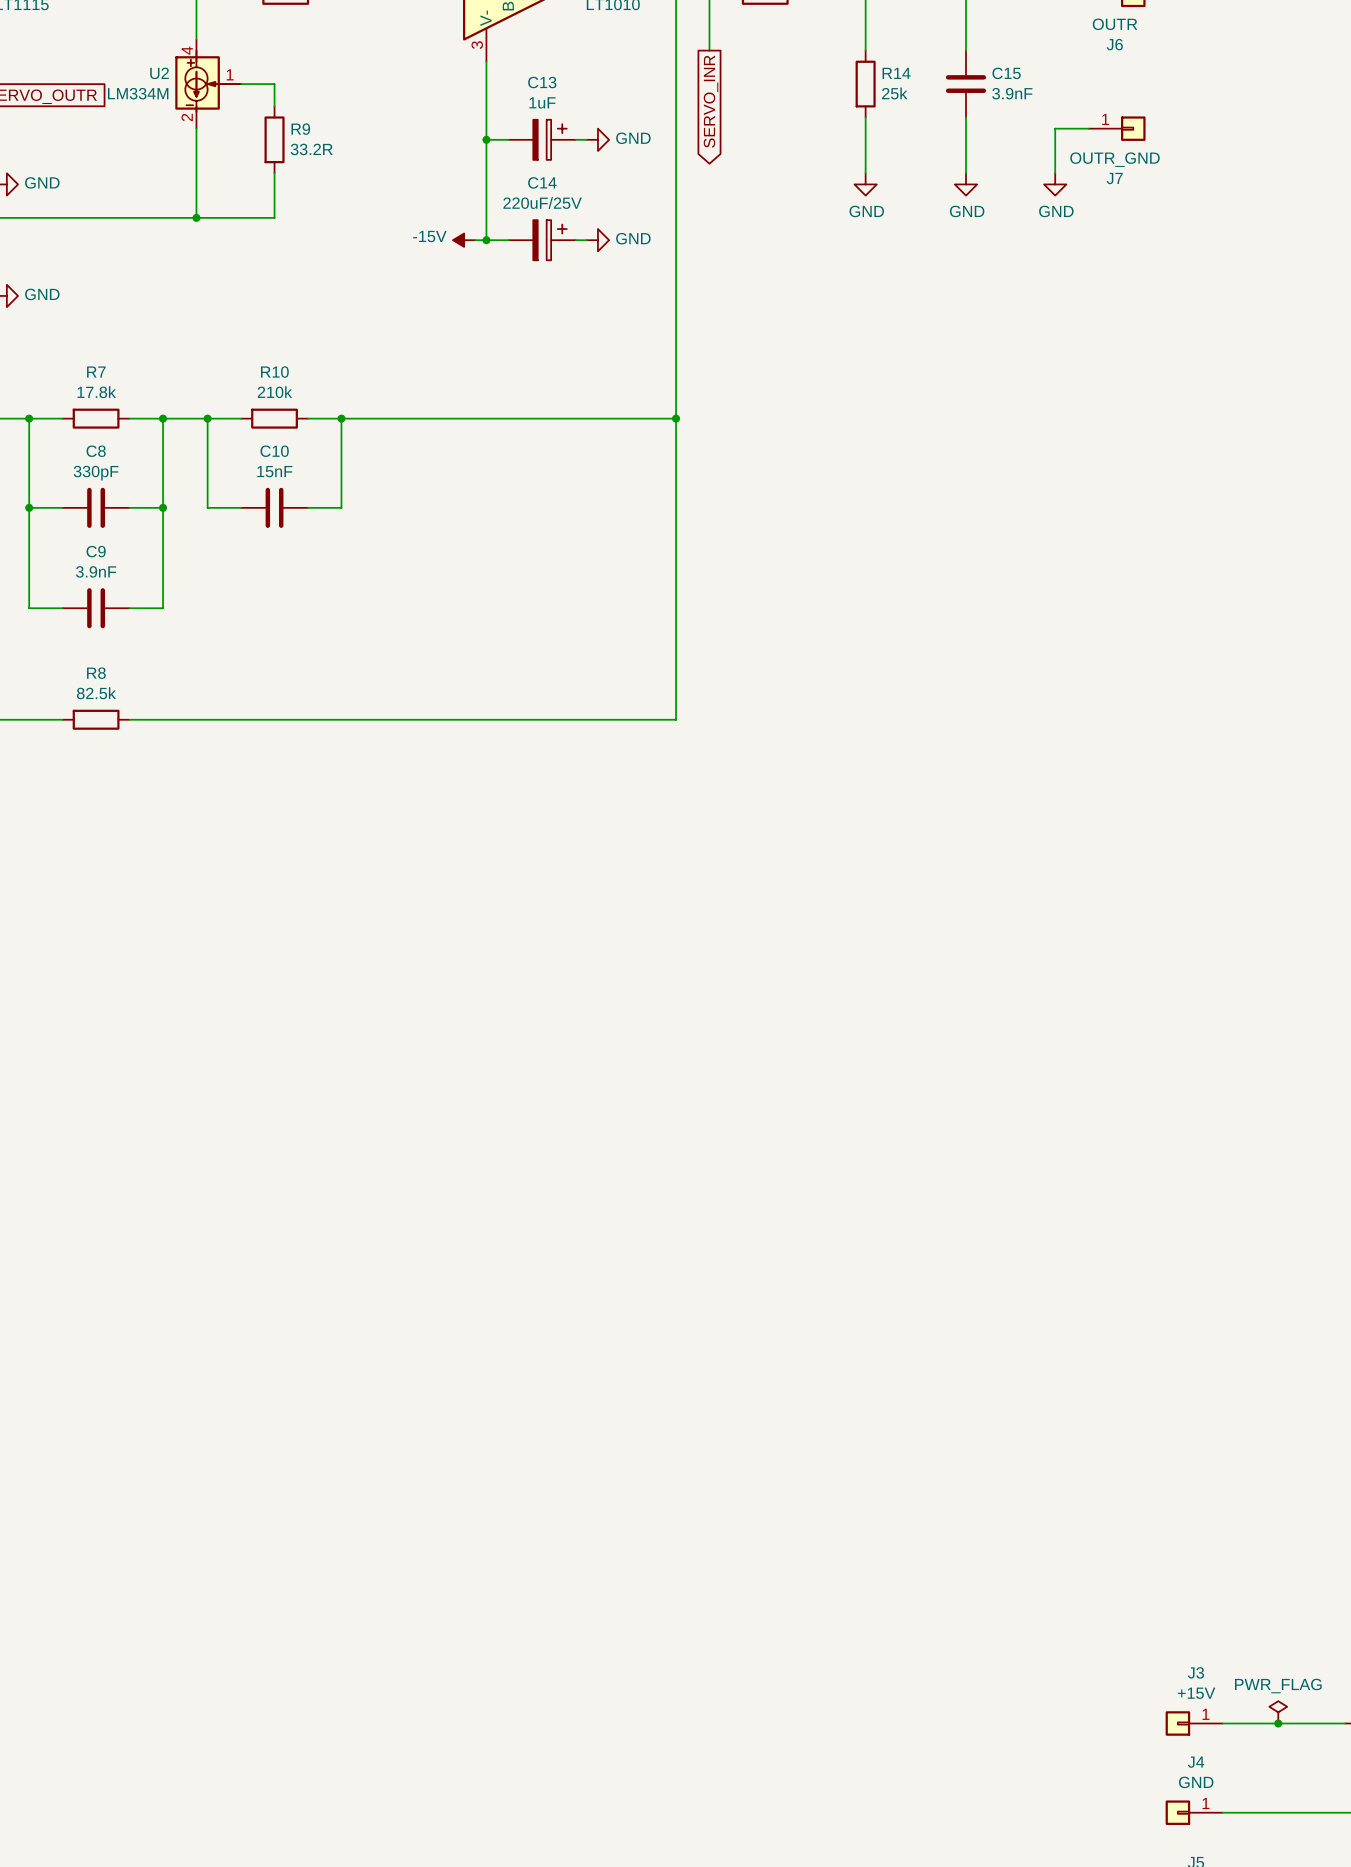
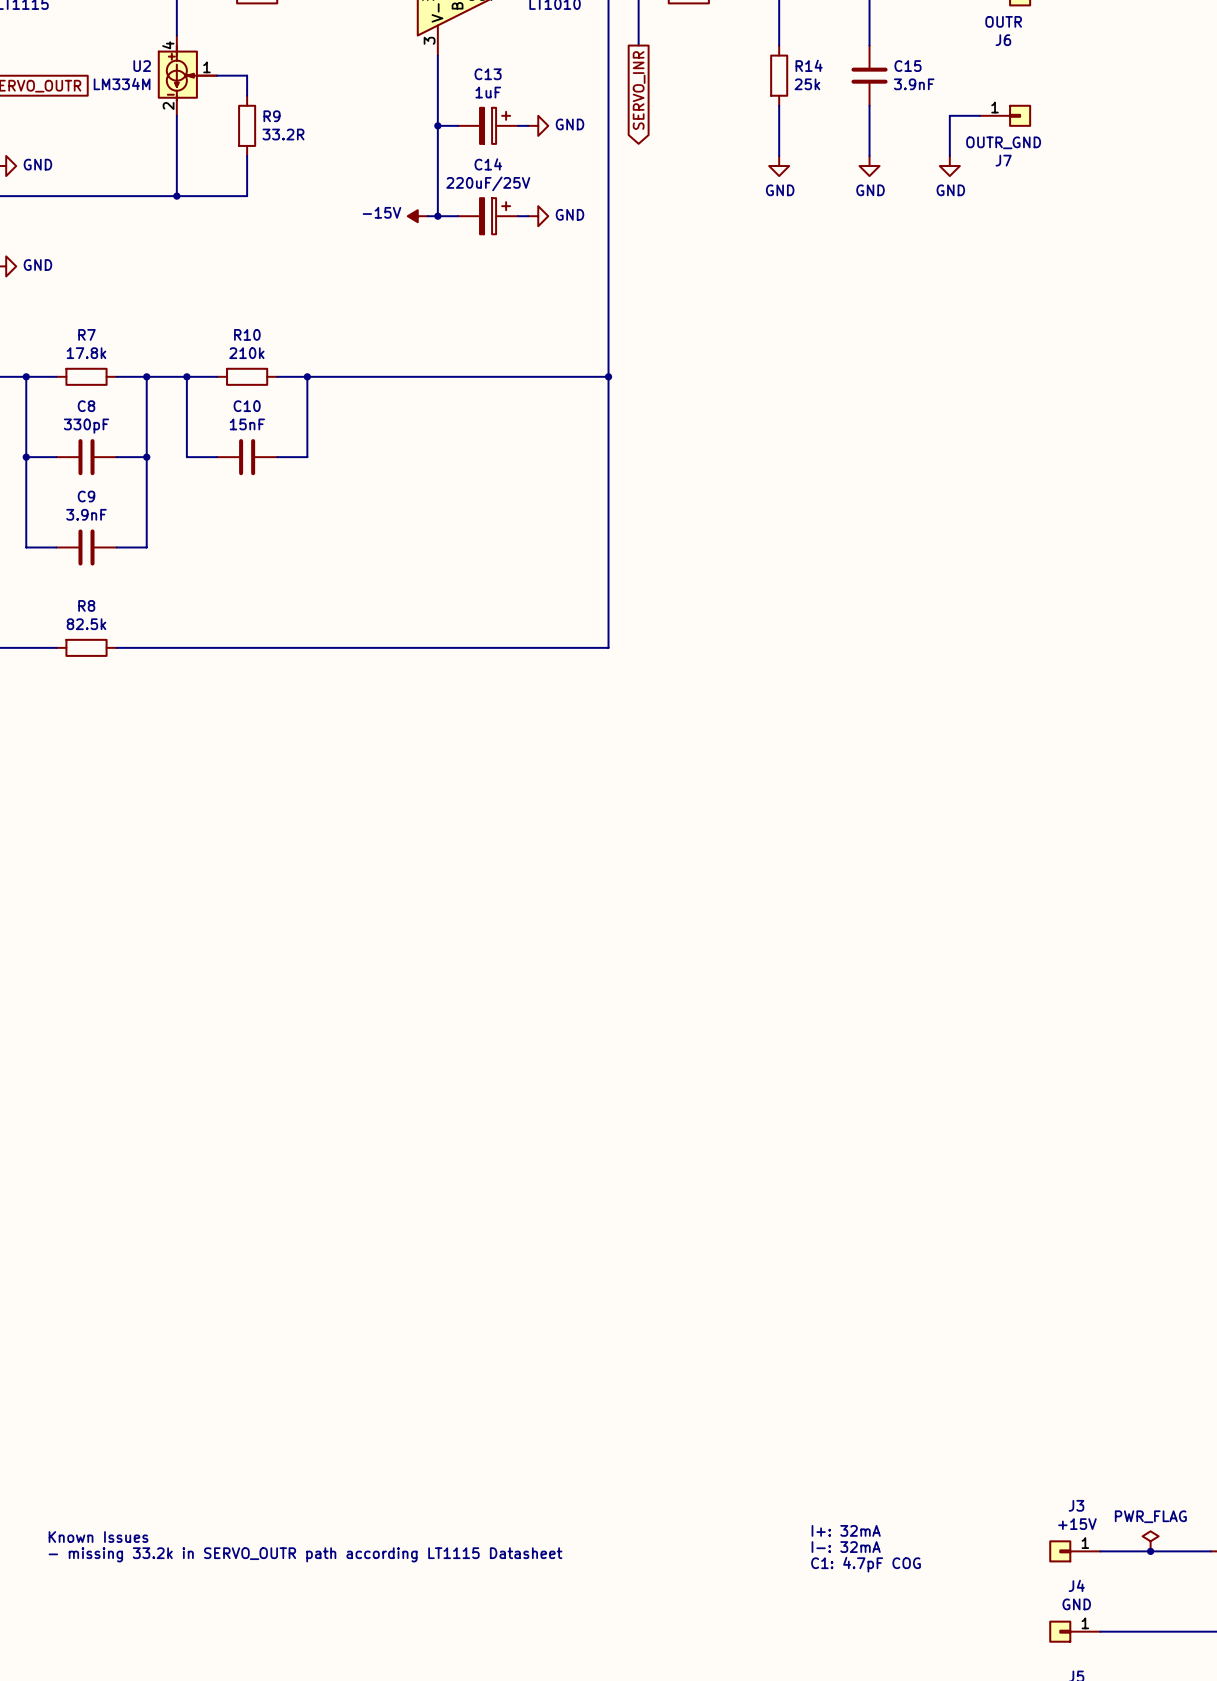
text: none -> I+: 32mA (846, 1530)
text: none -> Known Issues (98, 1537)
text: none -> I-: 32mA (846, 1547)
text: none -> - missing 33.2k in SERVO_OUTR path according LT1115 Datasheet (305, 1554)
text: none -> C1: 4.7pF COG (866, 1564)

